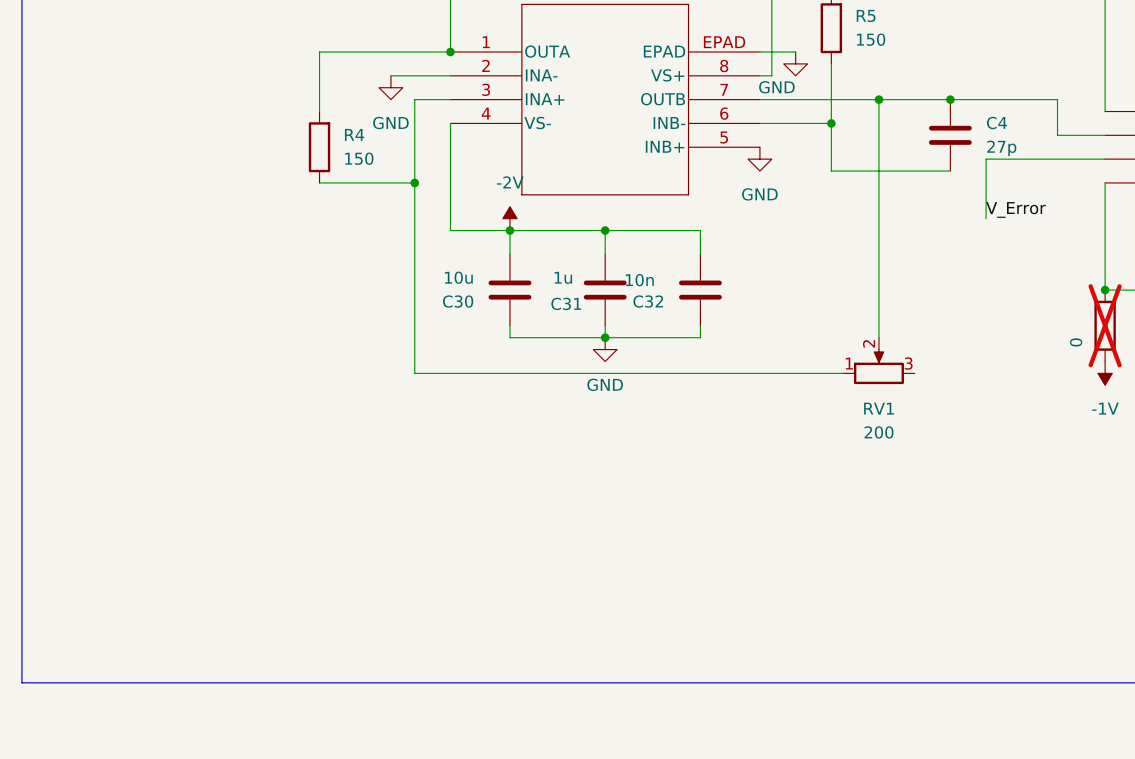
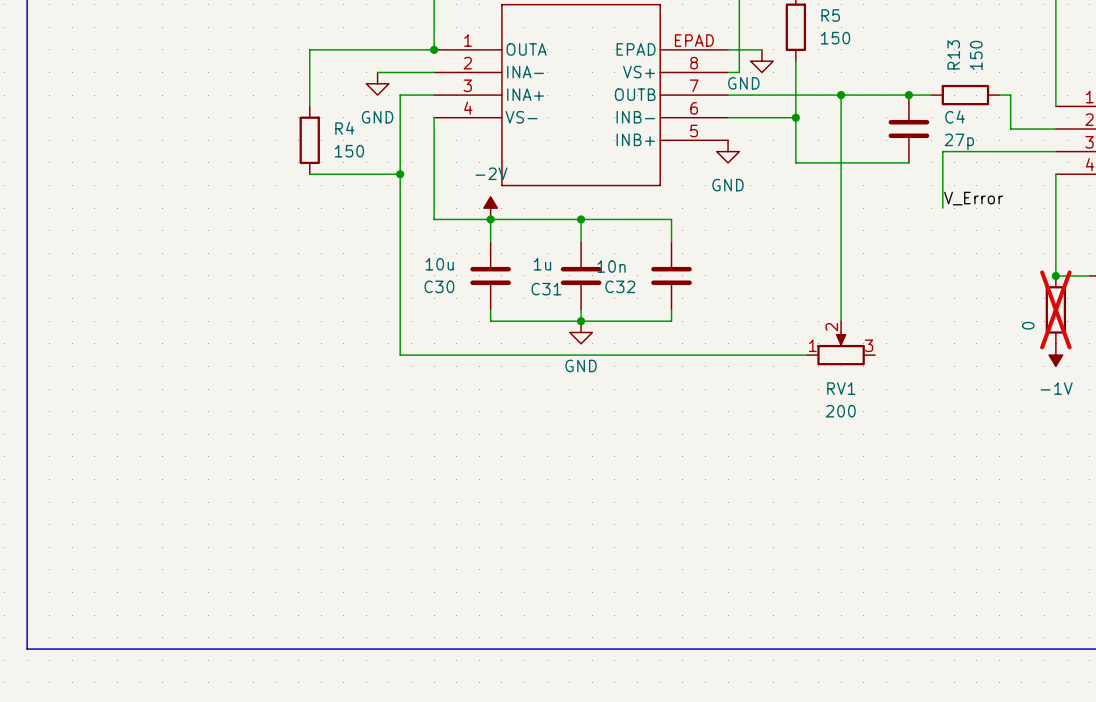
wire: (974, 99) (1045, 99) -> none
R13: none -> 150 (965, 95)

